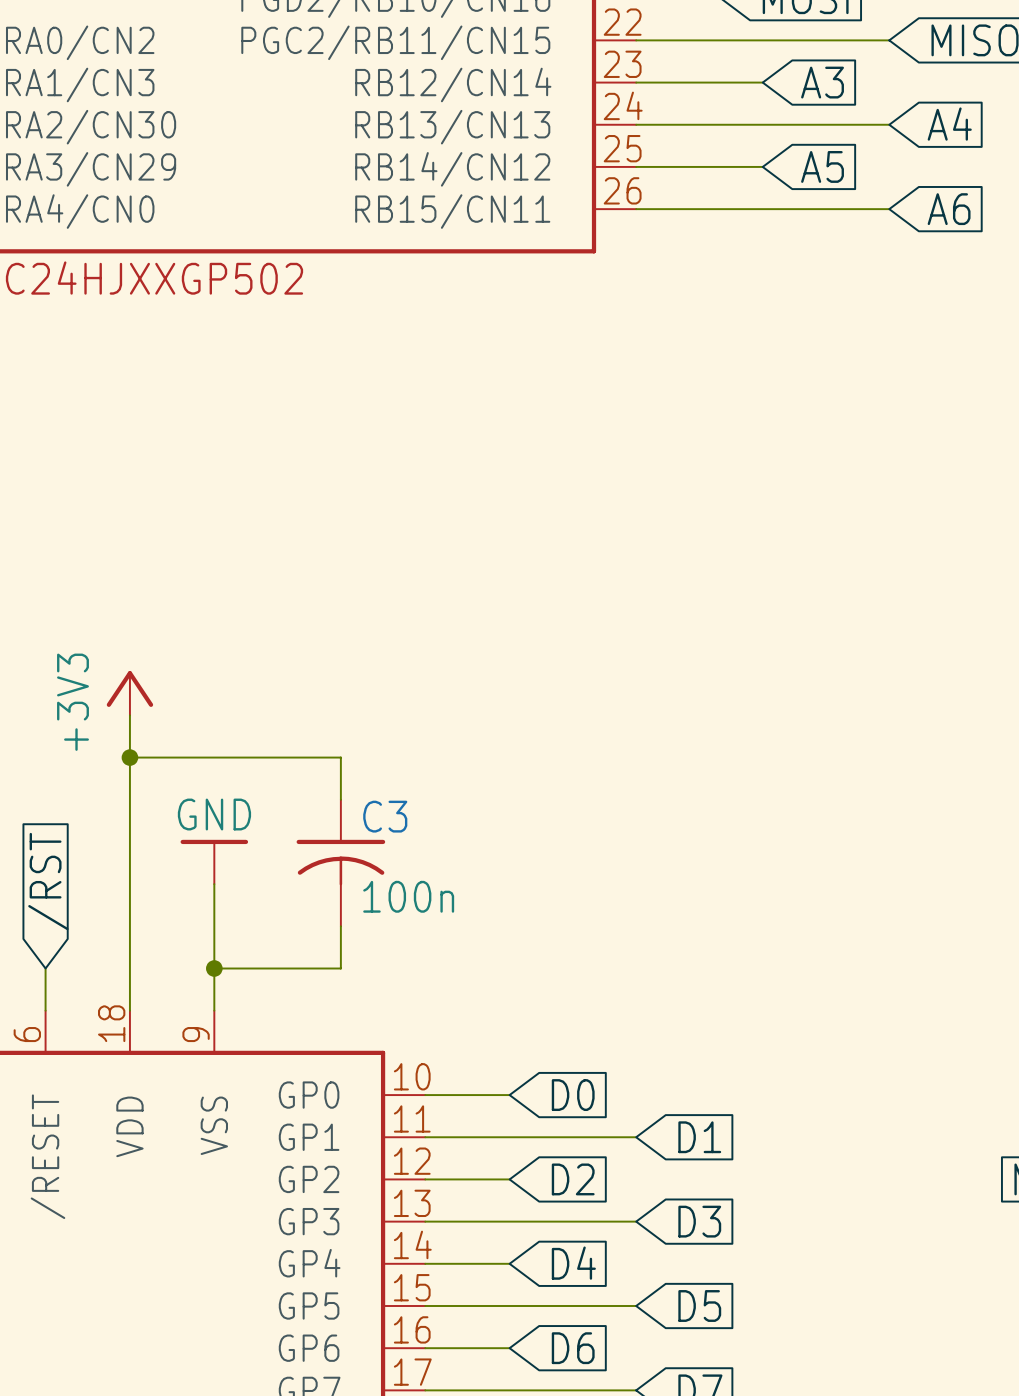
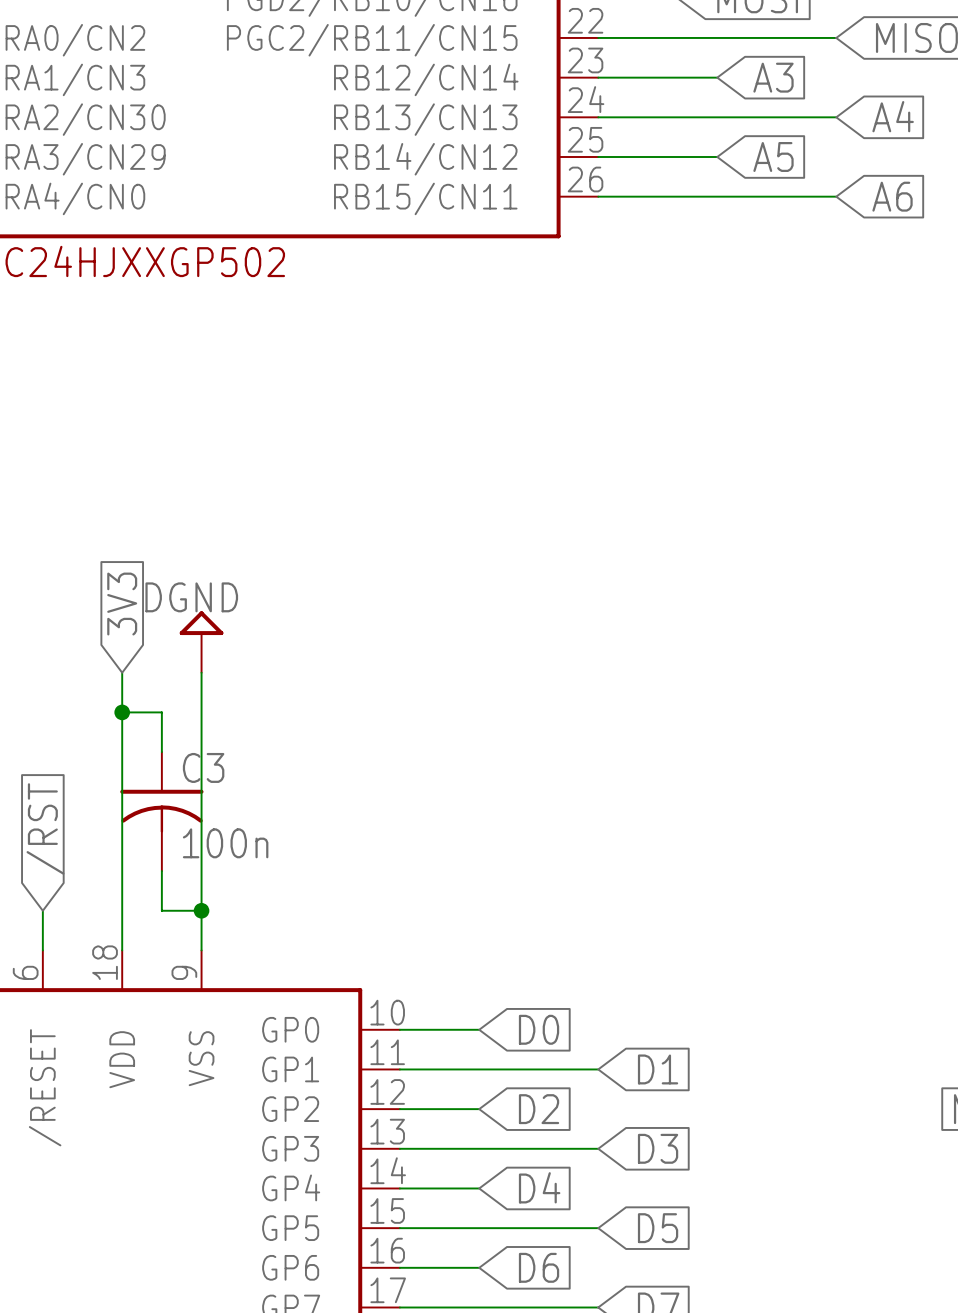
global label: none -> 3V3 (122, 604)
power symbol: none -> DGND (201, 641)
power symbol: +3V3 (129, 693) -> none
wire: none -> (201, 672) (201, 831)
wire: (172, 757) (340, 757) (340, 799) -> (161, 712) (161, 752)
power symbol: GND (214, 861) -> none
C3 position: (340, 863) -> (161, 811)
wire: (340, 926) (340, 968) (214, 968) -> (161, 871) (161, 910) (201, 910)

